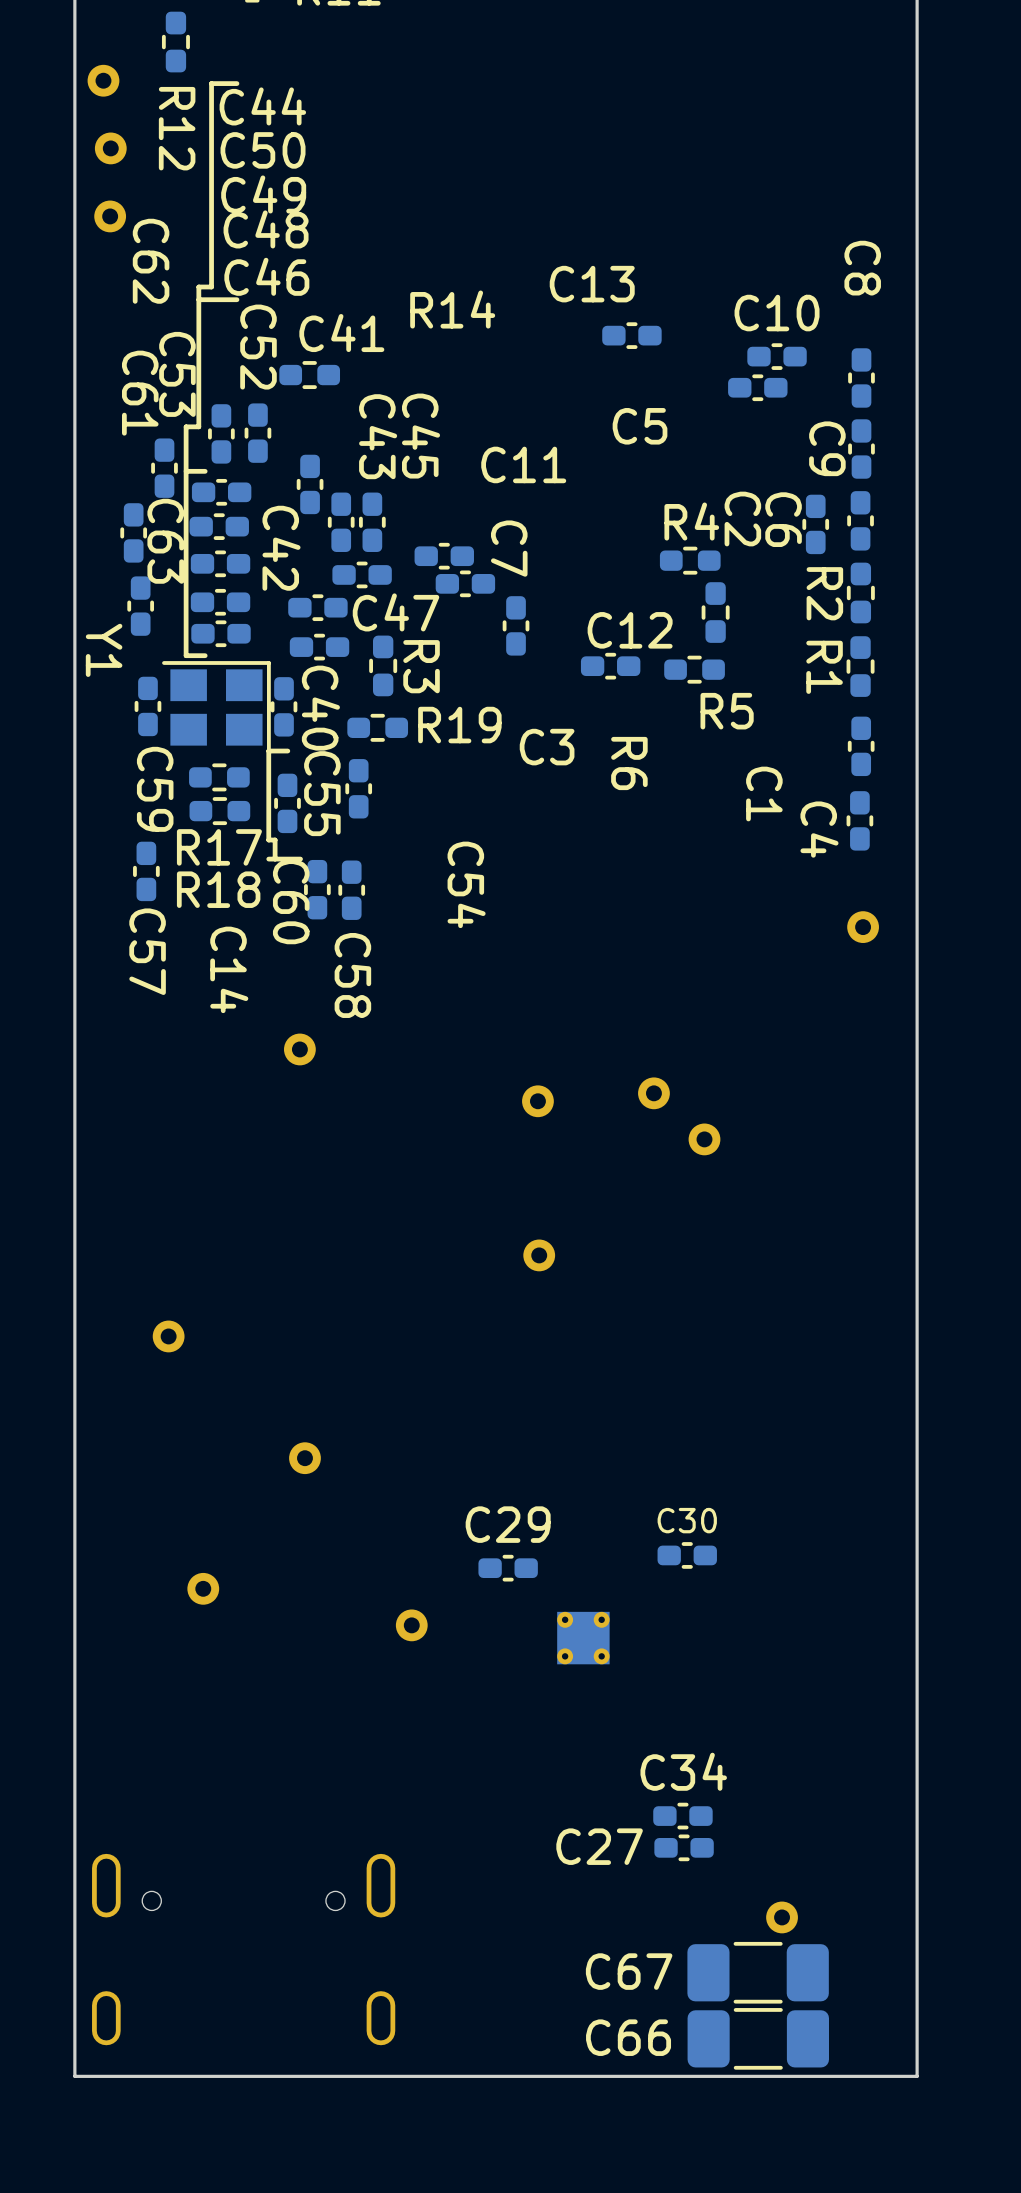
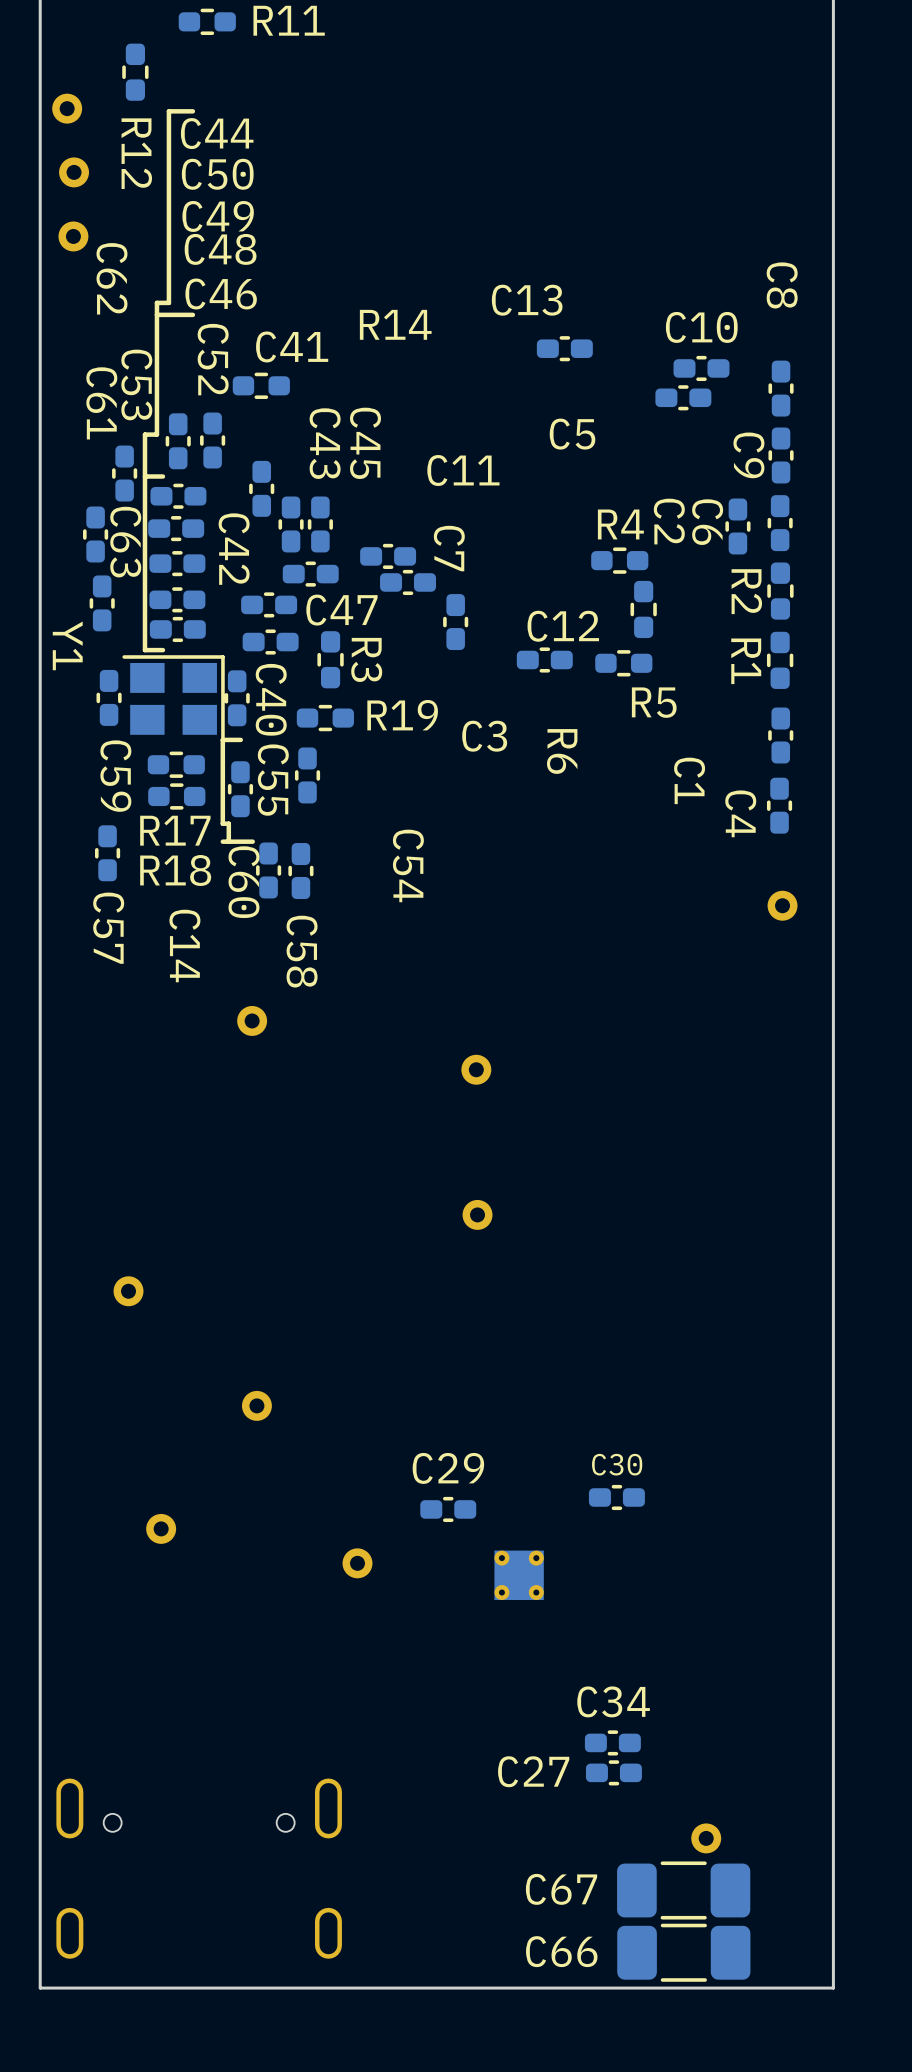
part: (653, 1093) -> none
part: (704, 1139) -> none

